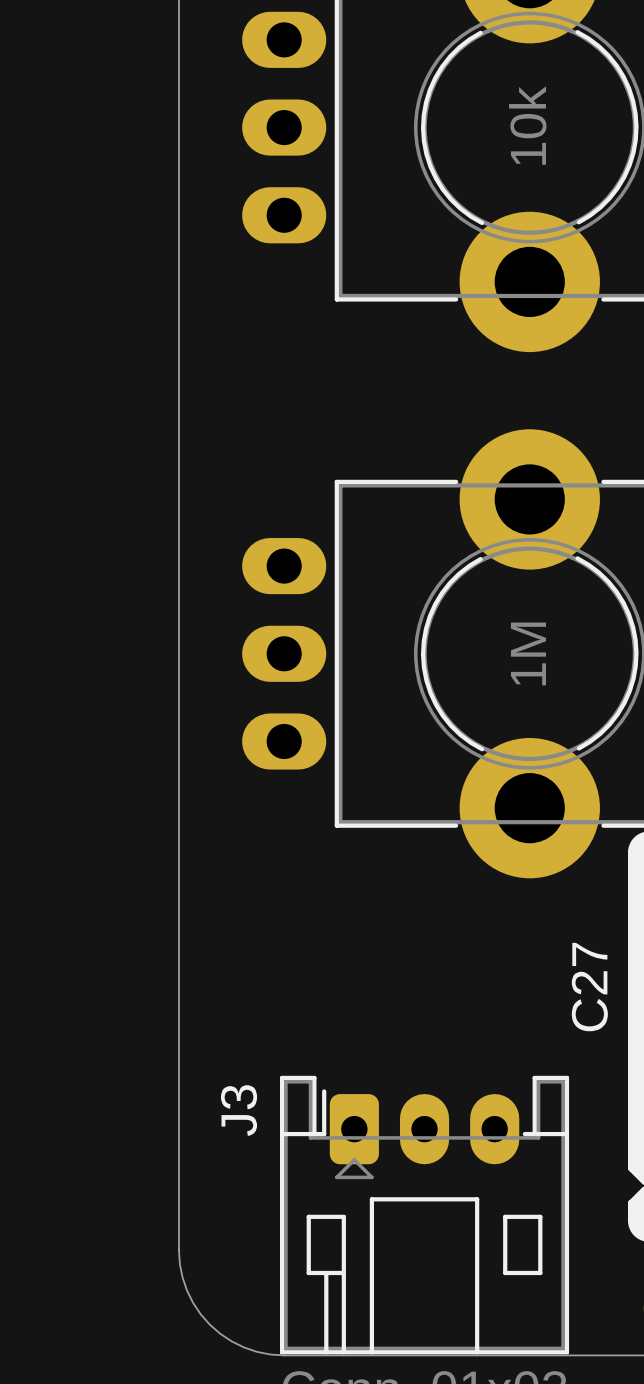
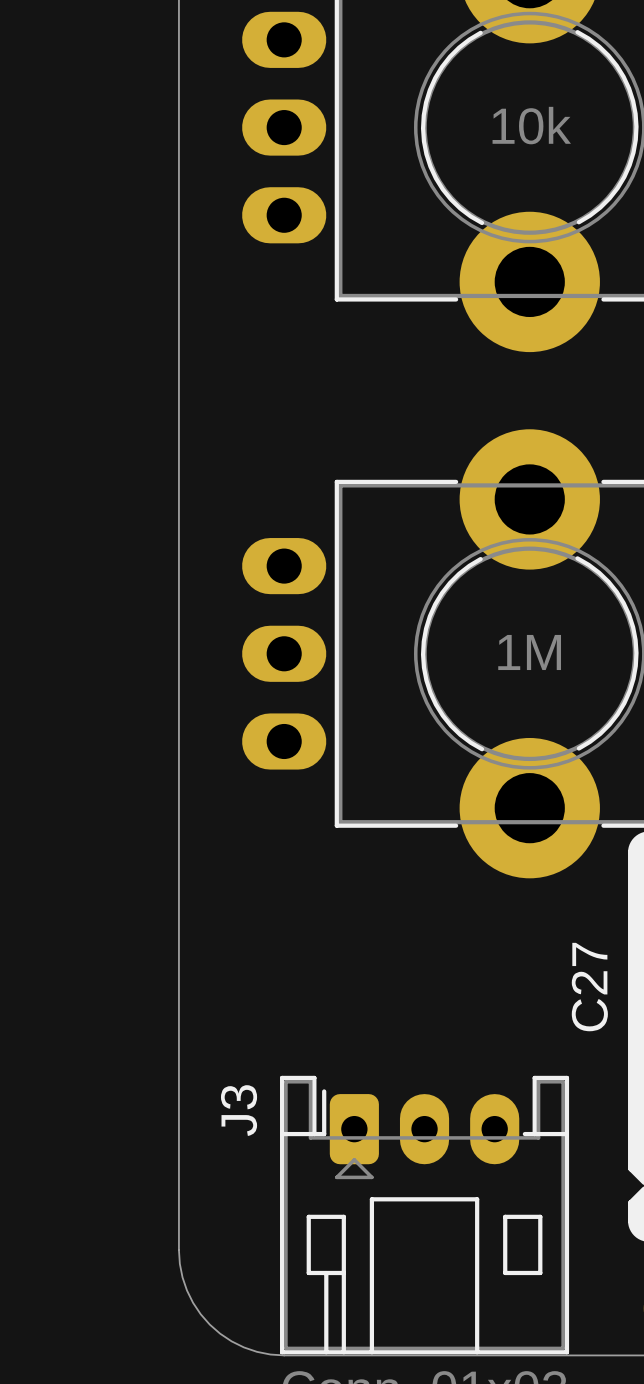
part value rotation: 0° (527, 125) -> 90° clockwise (531, 125)
part value rotation: 0° (528, 653) -> 90° clockwise (529, 652)

